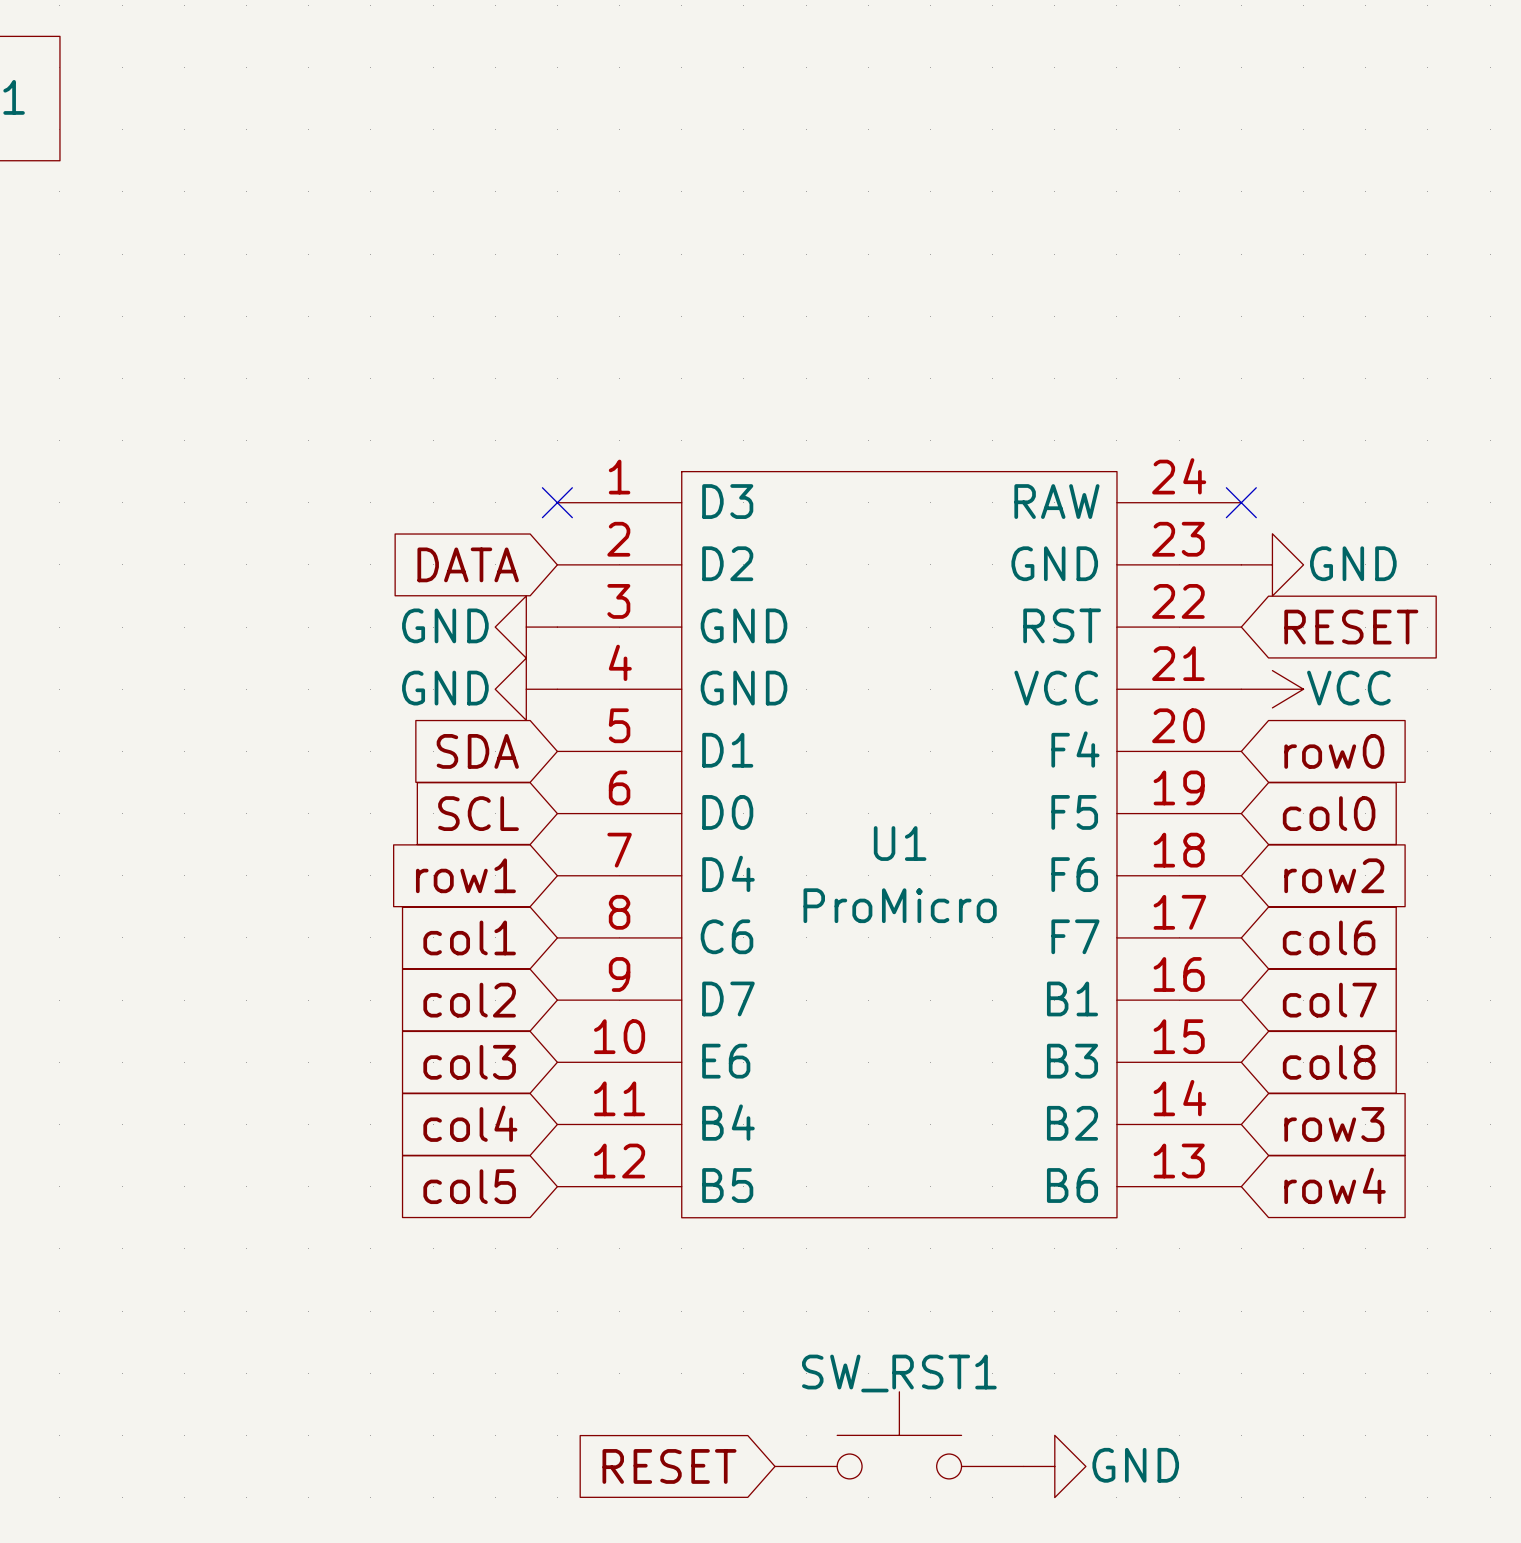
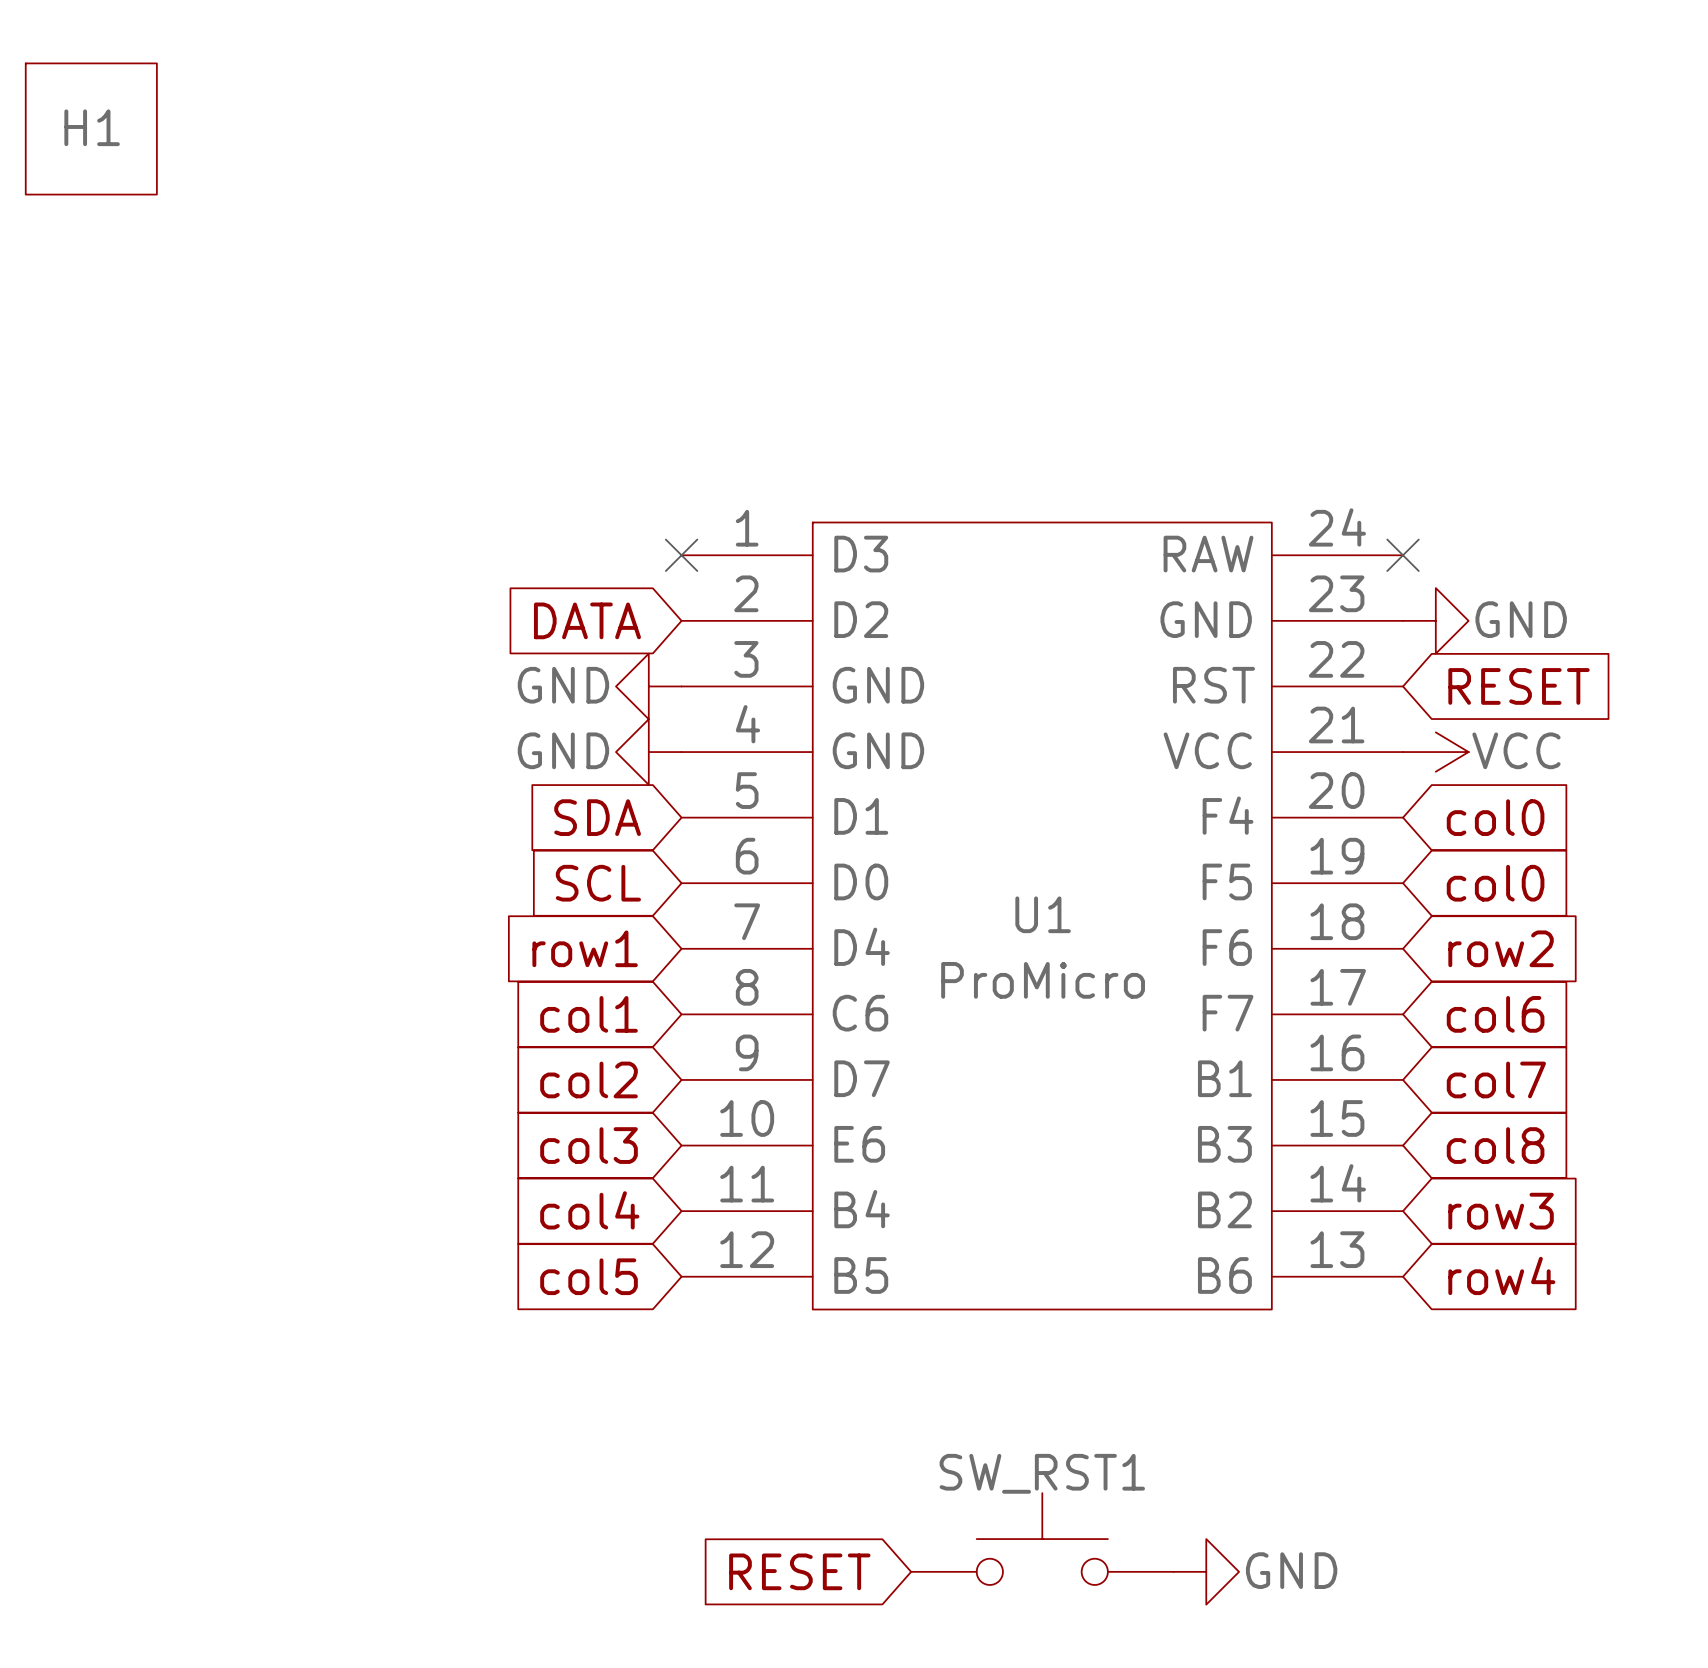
global label: row0 (1334, 751) -> col0 (1495, 817)

